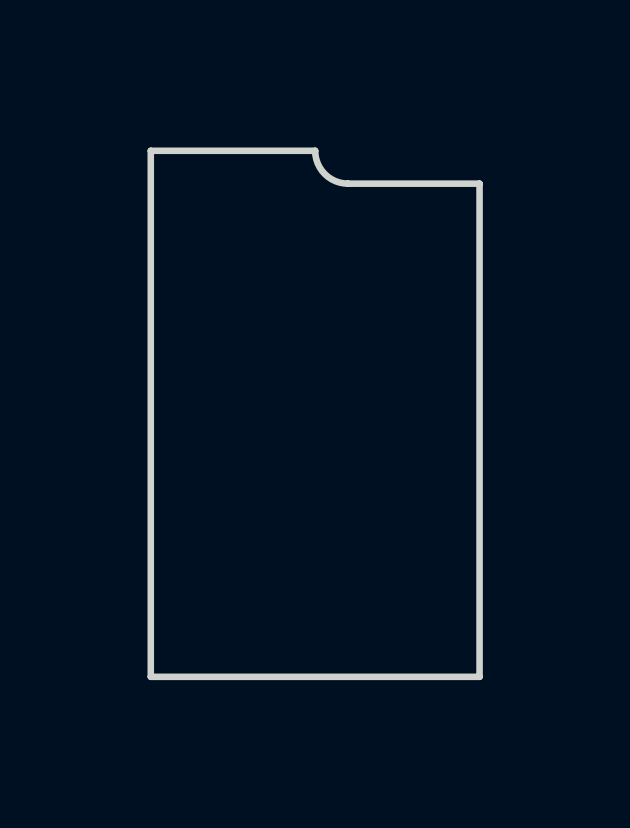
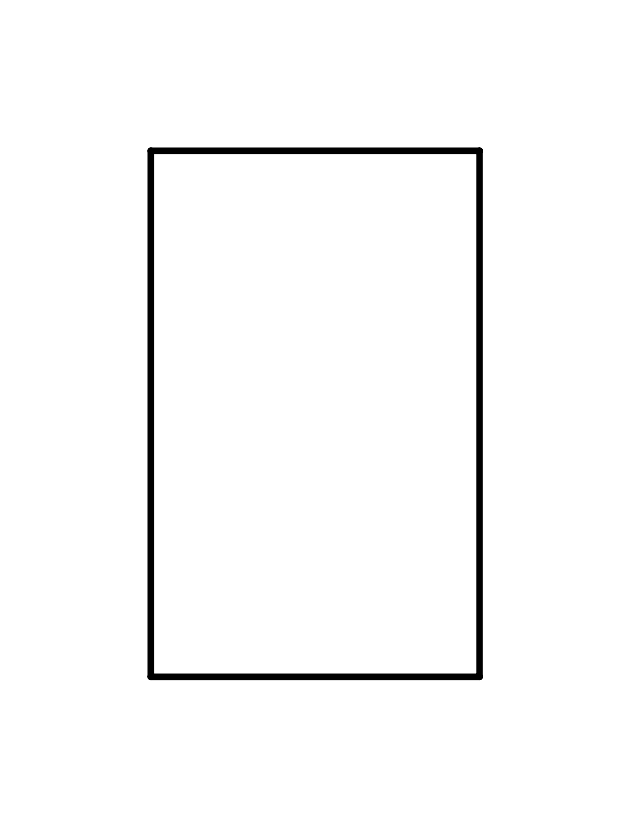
board edge: (315, 150) (316, 159) (321, 170) (331, 179) (339, 182) (479, 183) -> (315, 150) (479, 150) (479, 183)

